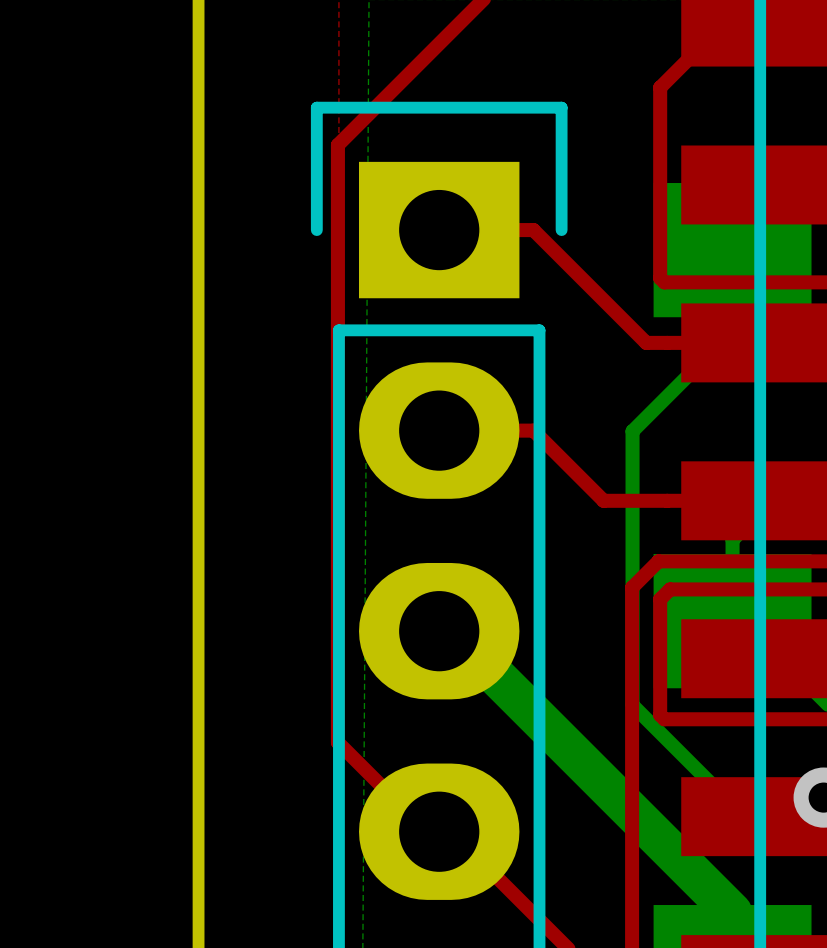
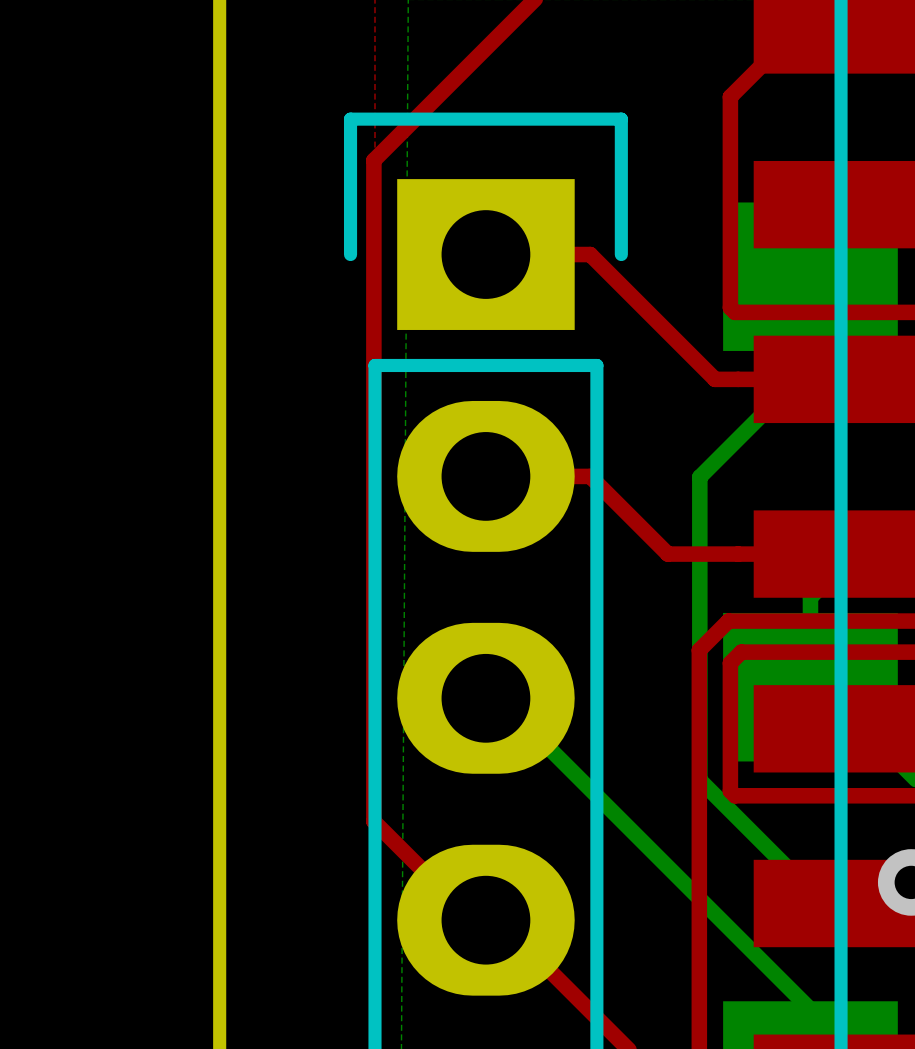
bottom track width: thick (451, 631) (732, 912) -> thin (499, 698) (810, 1009)

